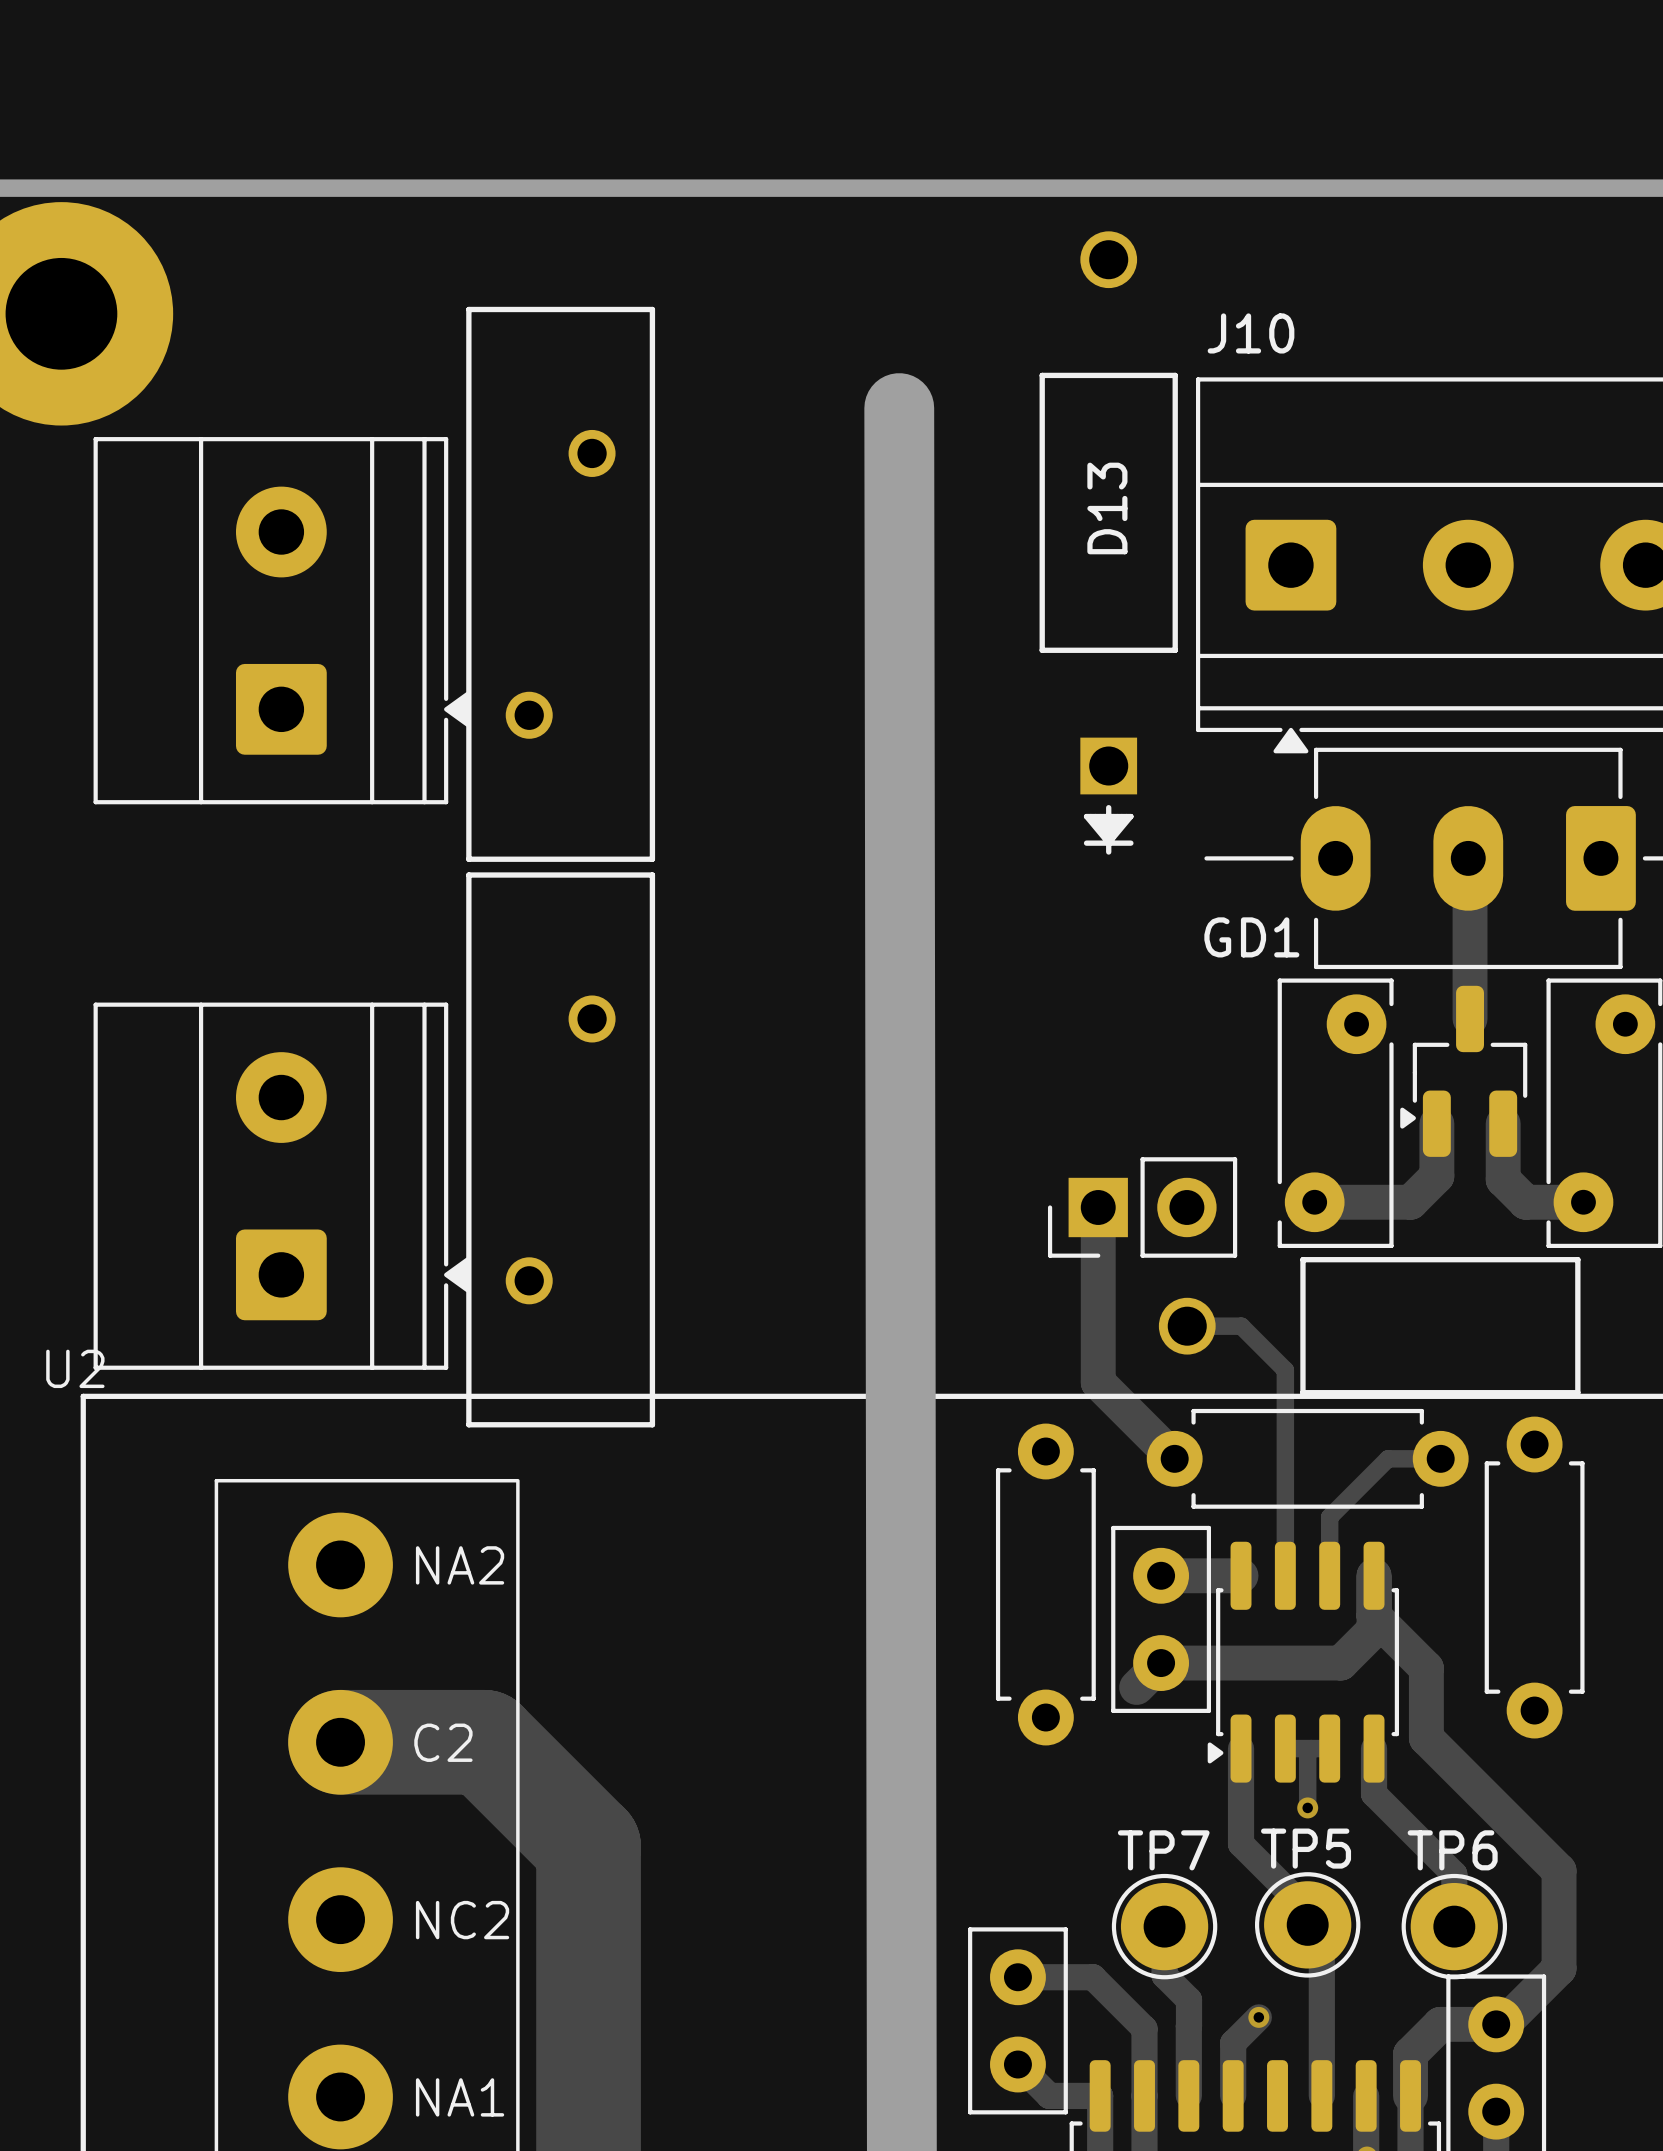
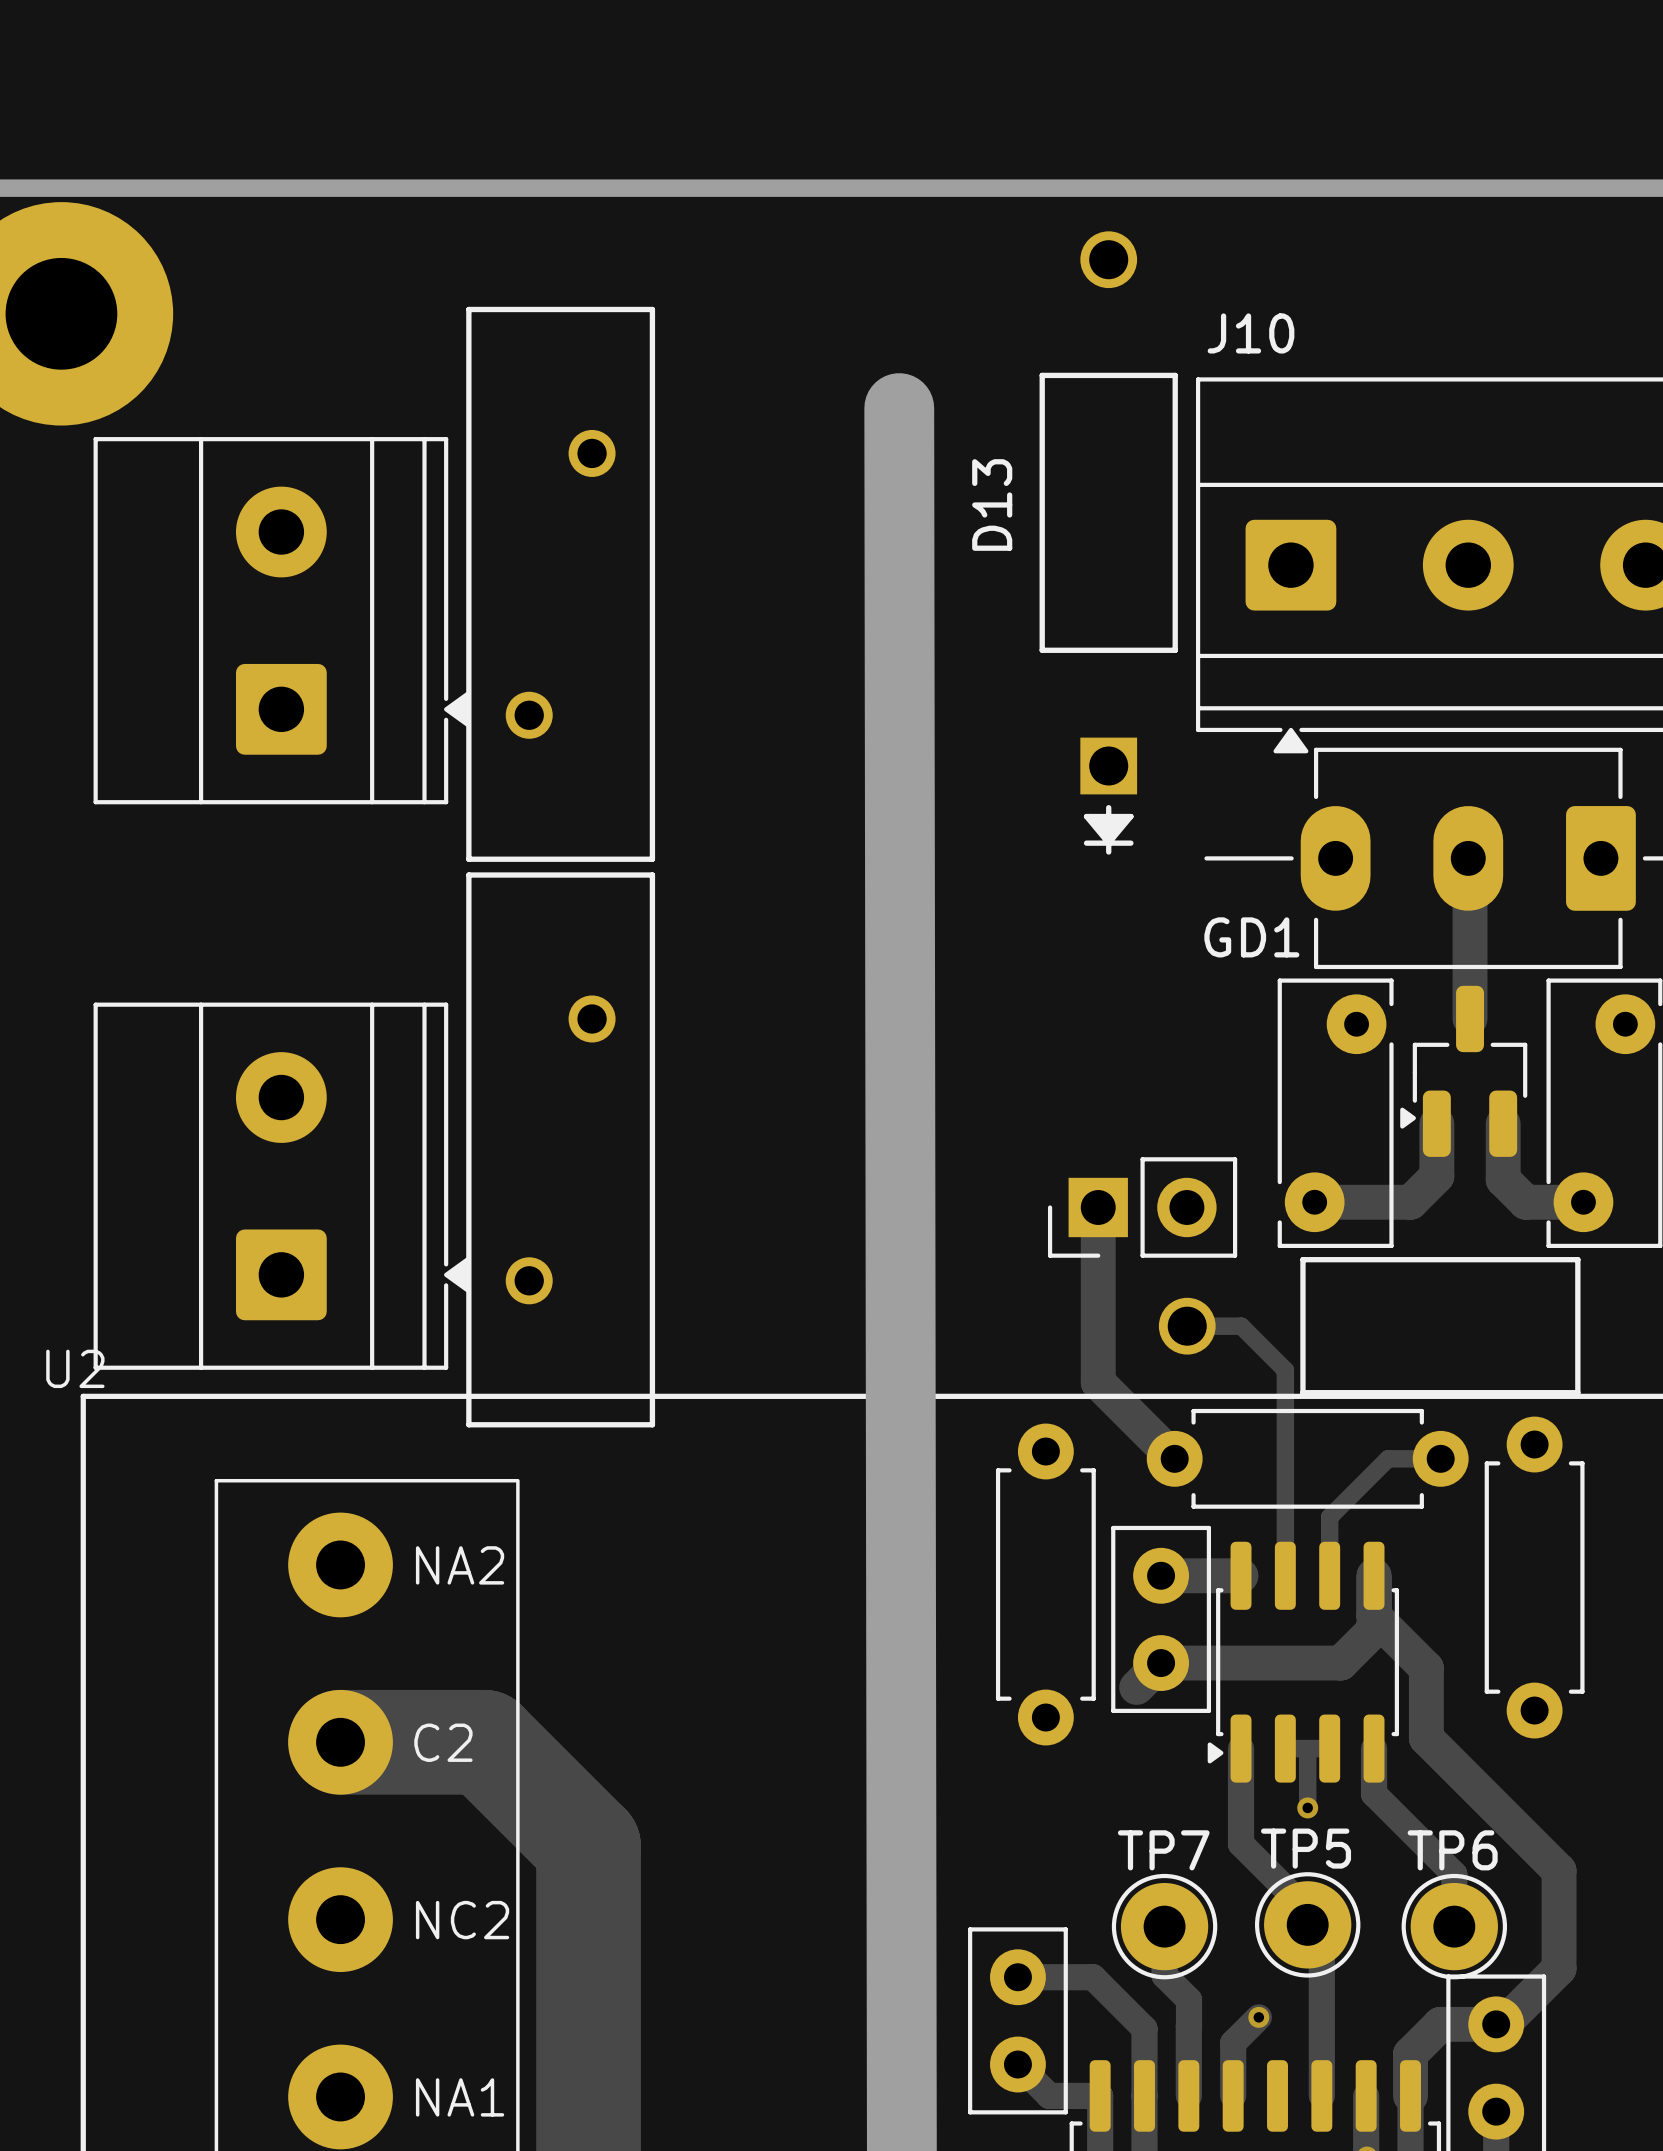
D13 name position: D13 (1107, 508) -> D13 (992, 504)

